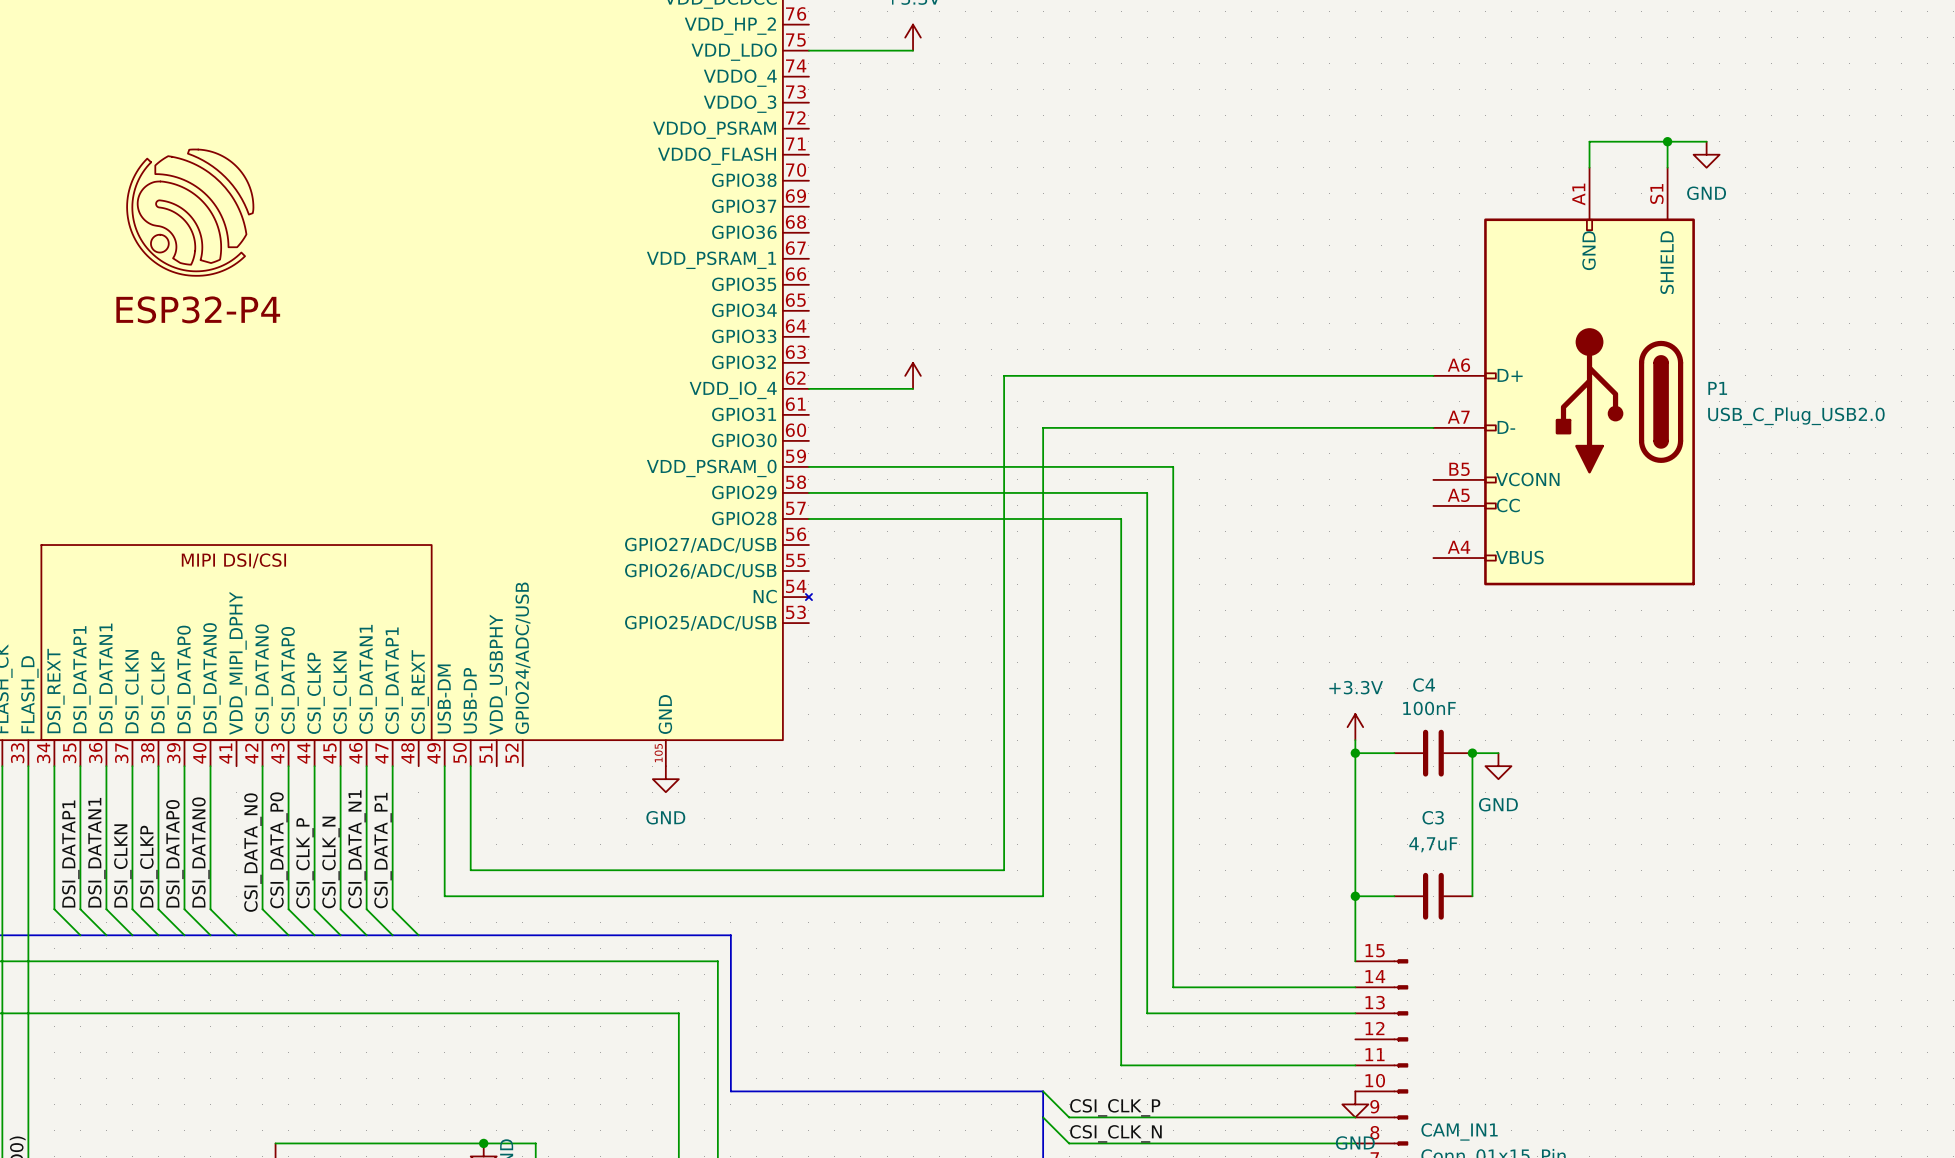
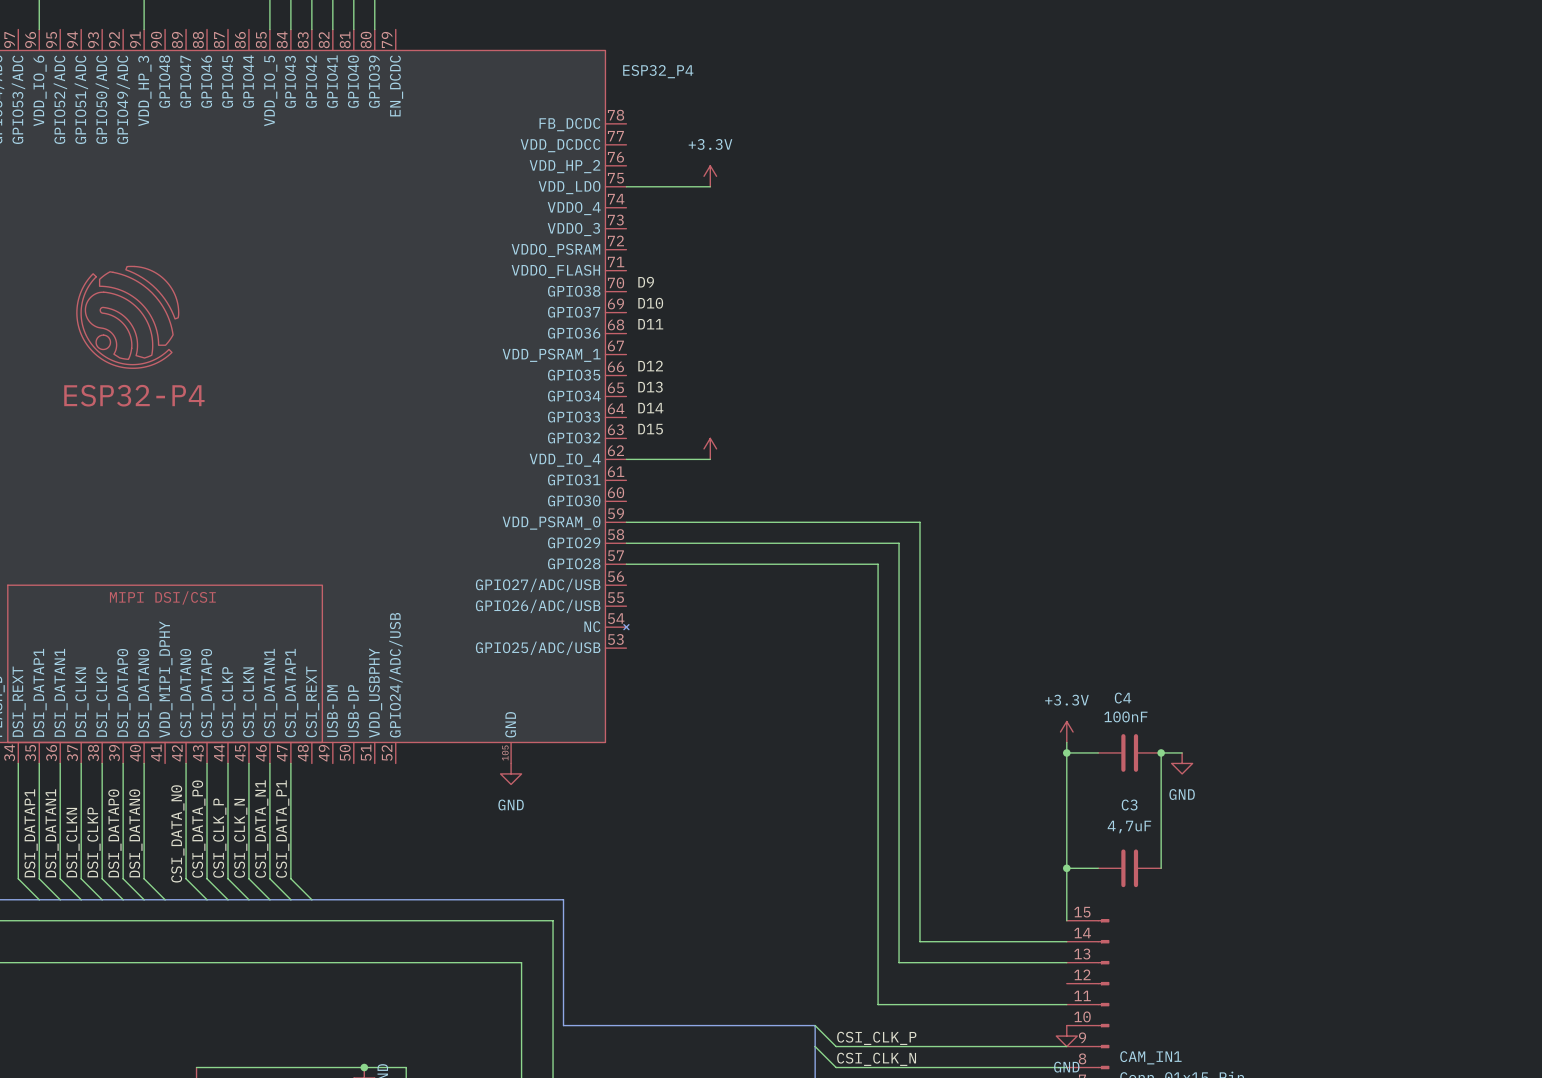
wire: (1667, 141) (1667, 167) -> none
junction: (1667, 141) -> none
wire: (1706, 141) (1589, 141) (1589, 167) -> none
power symbol: GND (1706, 154) -> none
label: none -> D9 (646, 282)
label: none -> D10 (650, 303)
label: none -> D11 (650, 324)
label: none -> D12 (650, 366)
label: none -> D13 (650, 387)
label: none -> D14 (650, 408)
label: none -> D15 (650, 429)
wire: (1433, 375) (1004, 375) (1004, 870) (470, 870) (470, 766) -> none
P1: USB_C_Plug_USB2.0 (1564, 376) -> none
wire: (1433, 427) (1043, 427) (1043, 896) (444, 896) (444, 766) -> none

